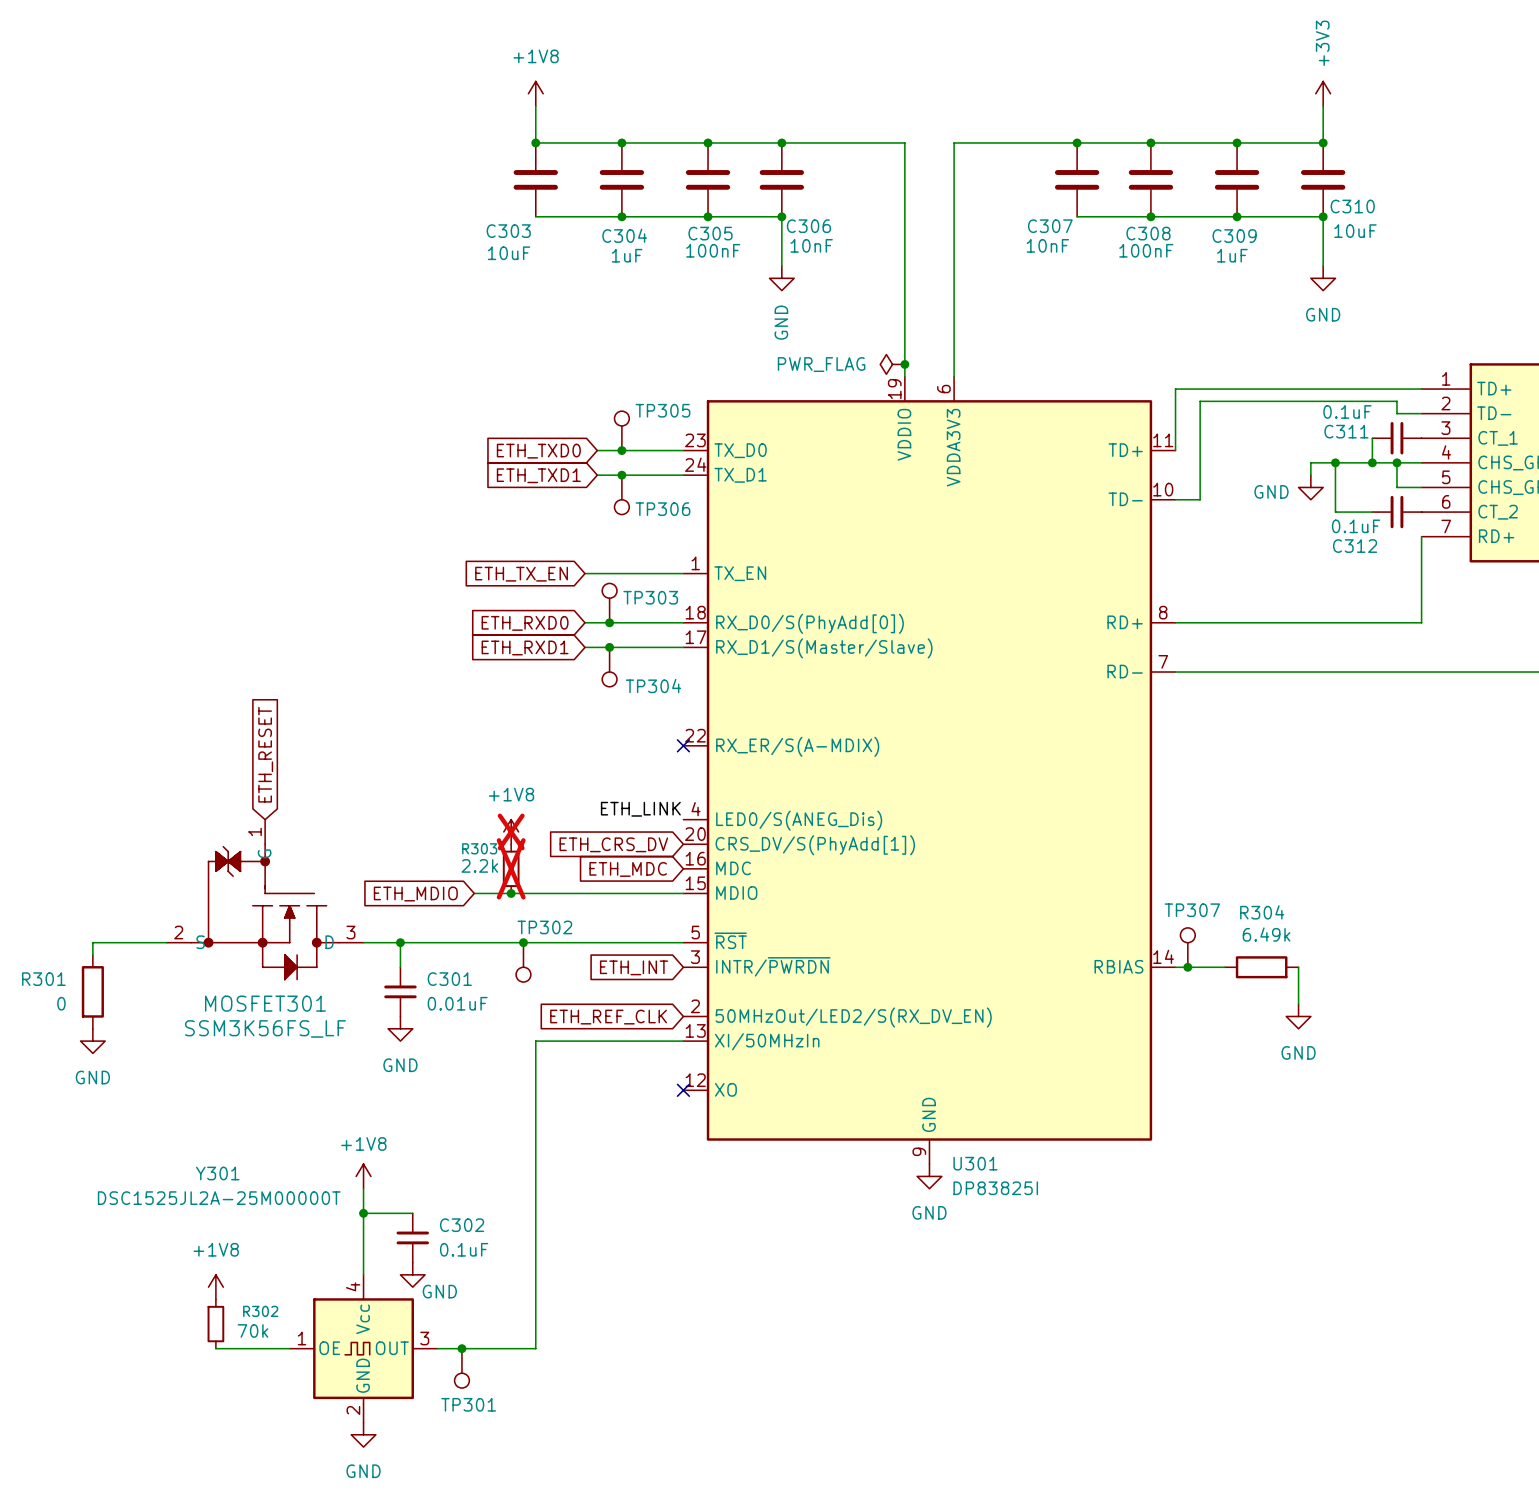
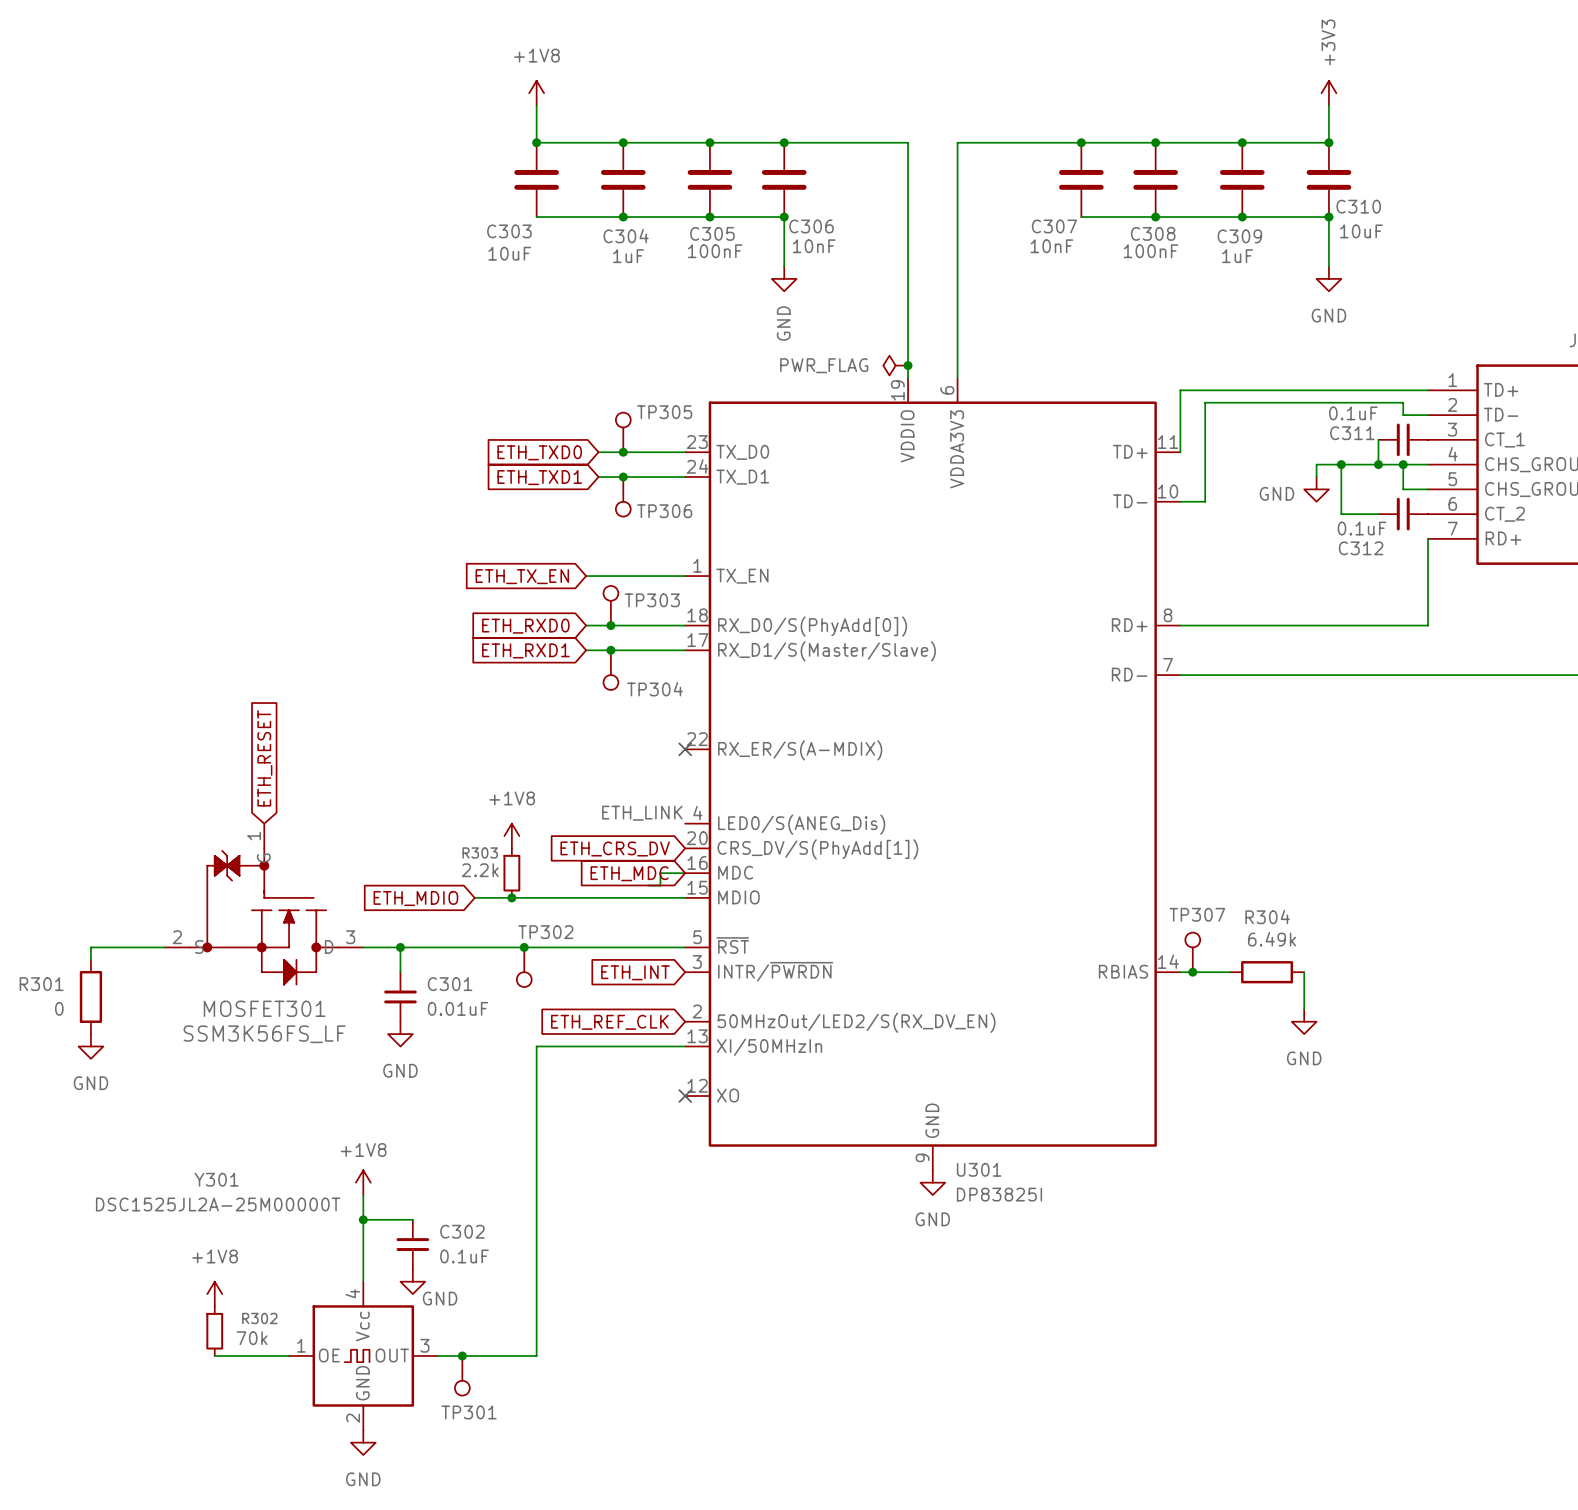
power symbol do-not-place cross: (511, 831) -> none
R303 do-not-place cross: (511, 868) -> none
wire: none -> (685, 873) (660, 873) (660, 885) (648, 885)

